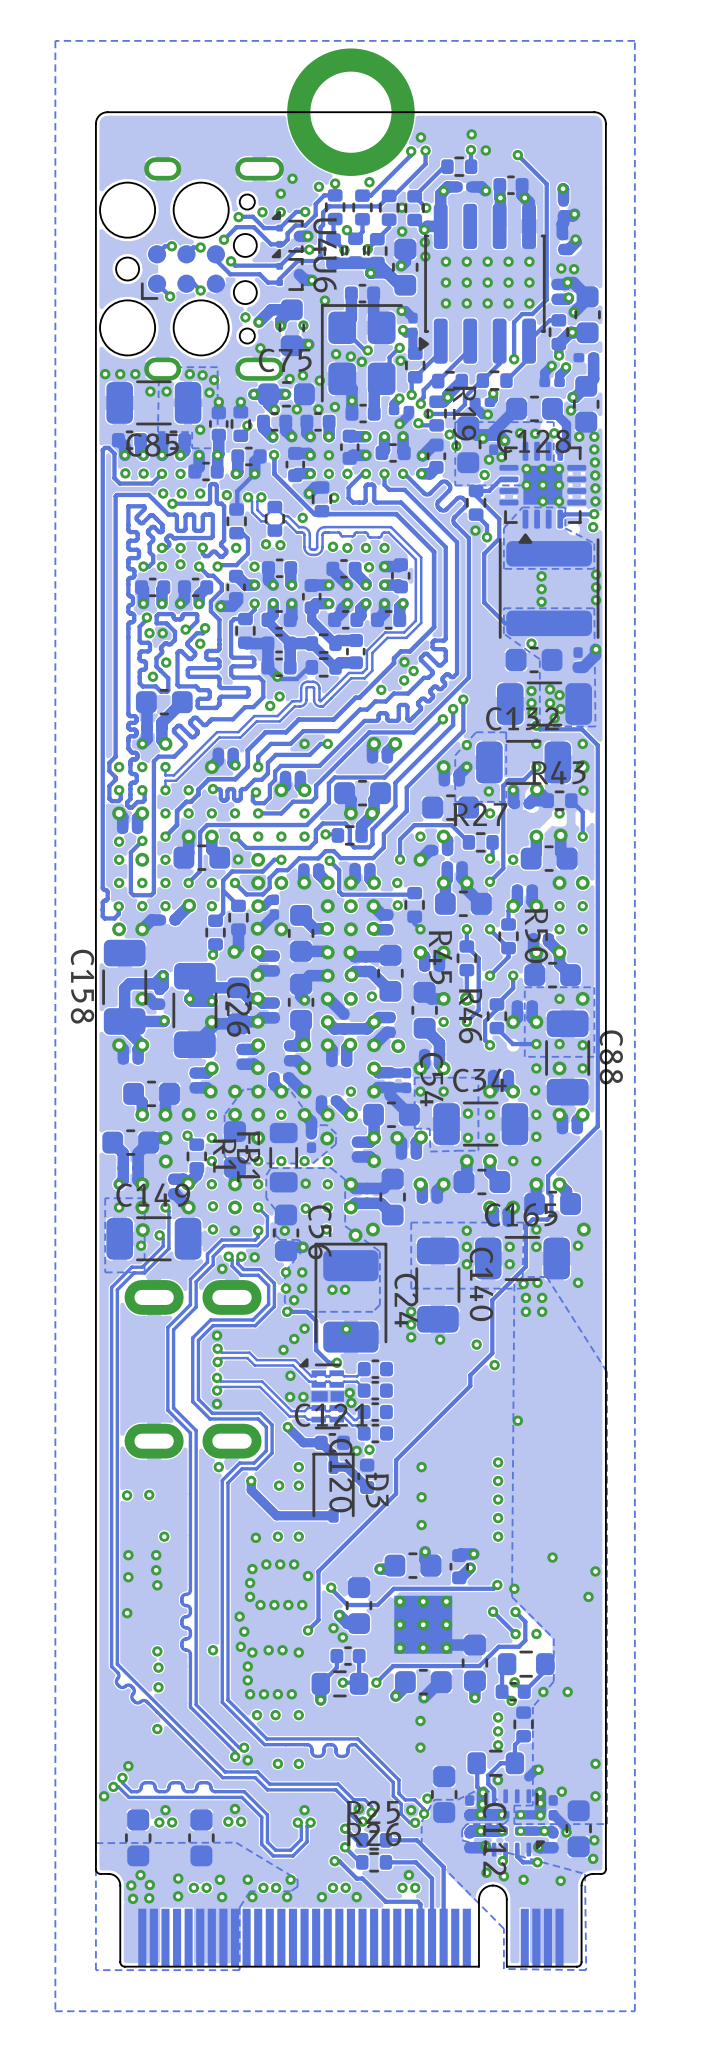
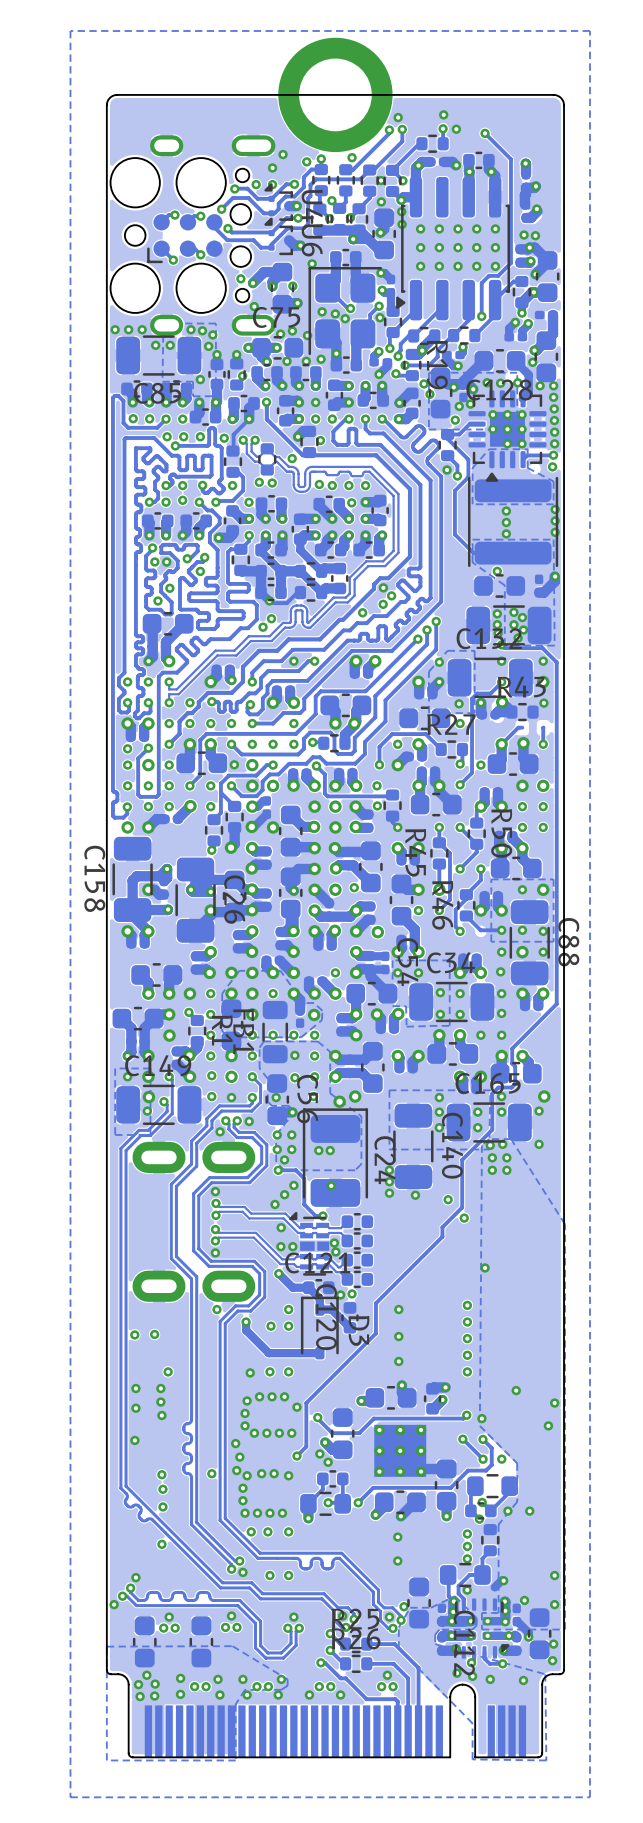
track: (571, 800) (582, 812) (582, 818) -> none
via: (559, 813) -> none
track: none -> (522, 727) (518, 727) (501, 744)

